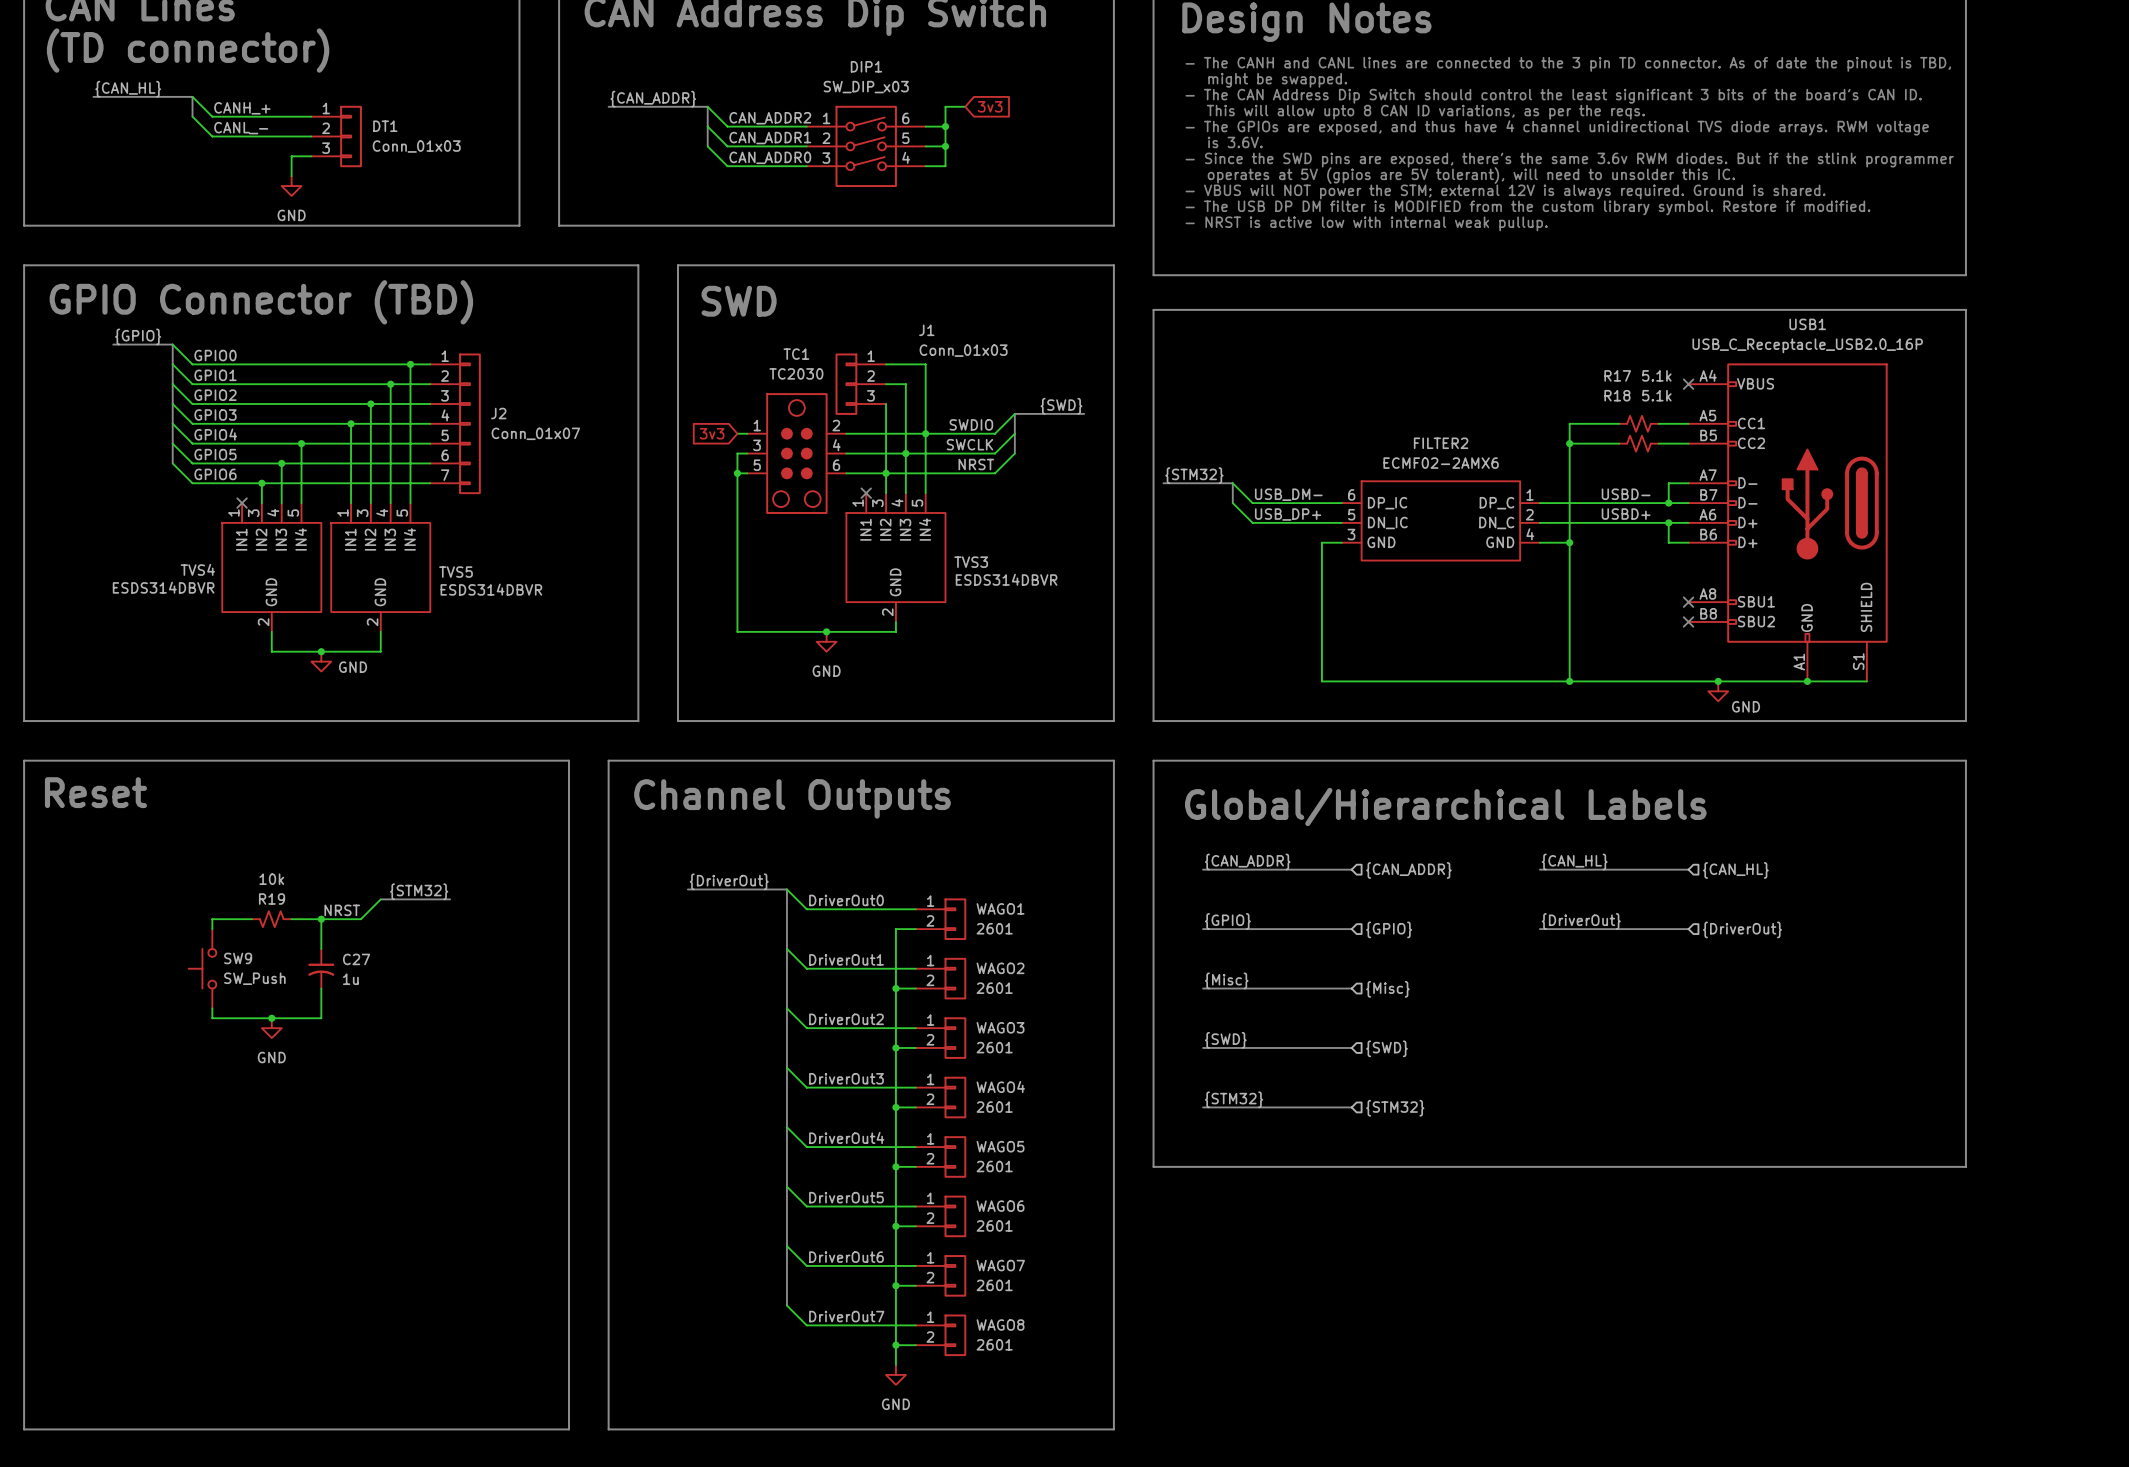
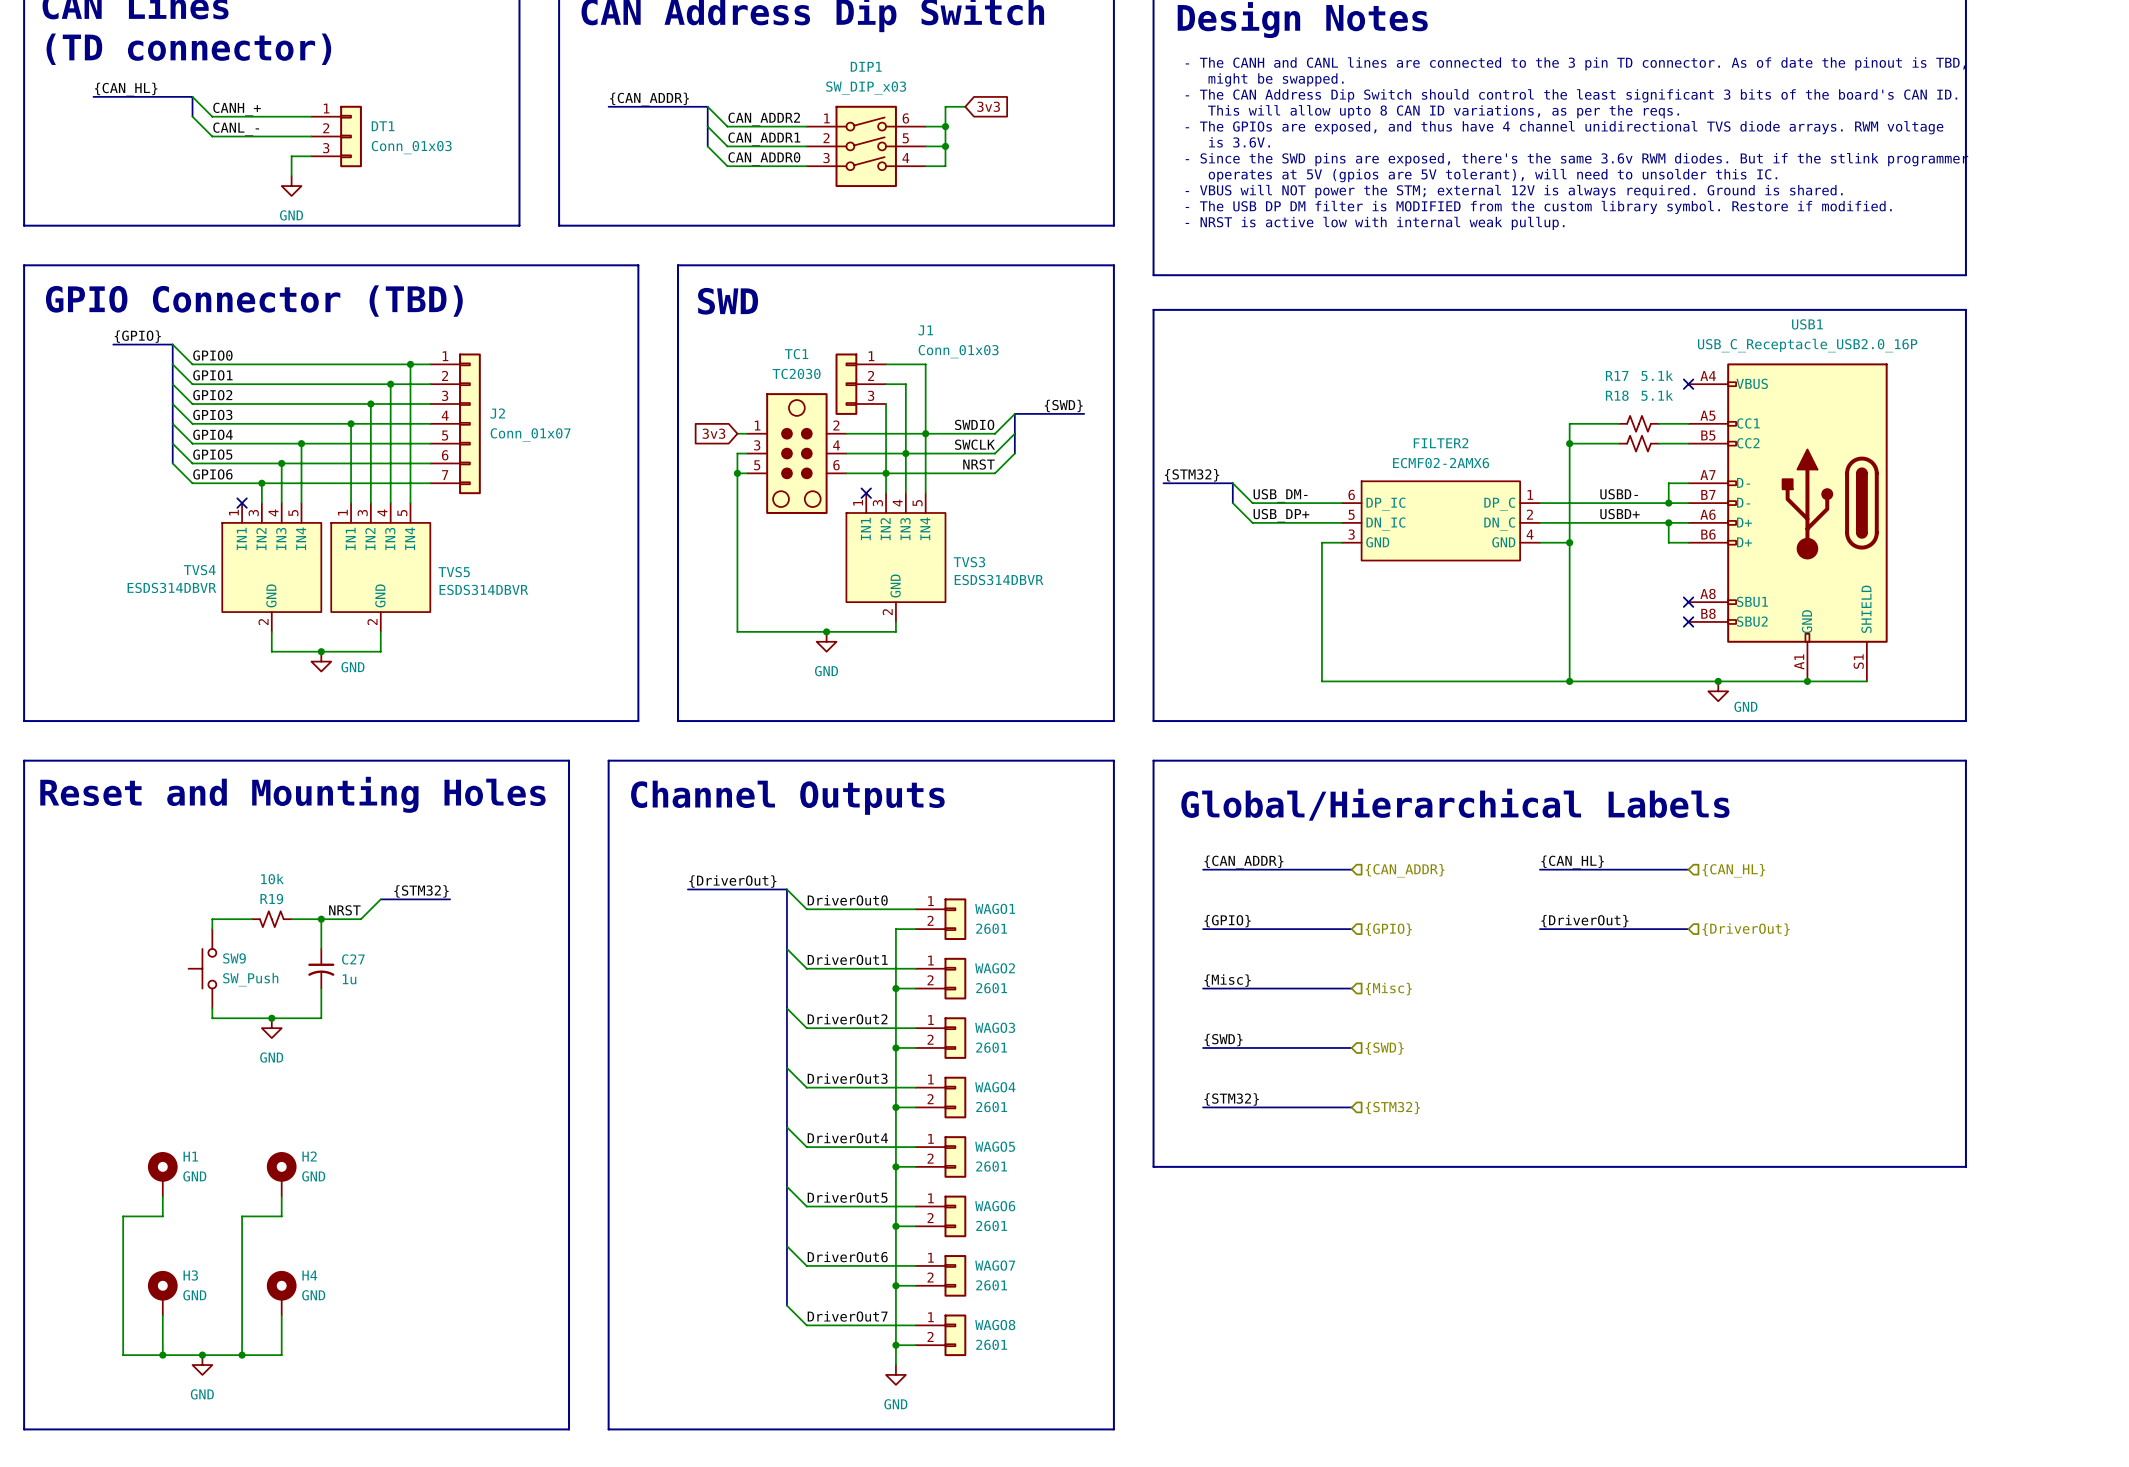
text: Reset (95, 792) -> Reset and Mounting Holes (292, 794)
H1: none -> GND (162, 1174)
H2: none -> GND (281, 1174)
wire: none -> (162, 1196) (162, 1216) (123, 1216) (123, 1355) (281, 1355) (281, 1315)
wire: none -> (281, 1196) (281, 1216) (242, 1216) (242, 1355)
H3: none -> GND (162, 1293)
H4: none -> GND (281, 1293)
wire: none -> (162, 1315) (162, 1355)
junction: none -> (162, 1355)
junction: none -> (202, 1355)
junction: none -> (242, 1355)
power symbol: none -> GND (202, 1365)

